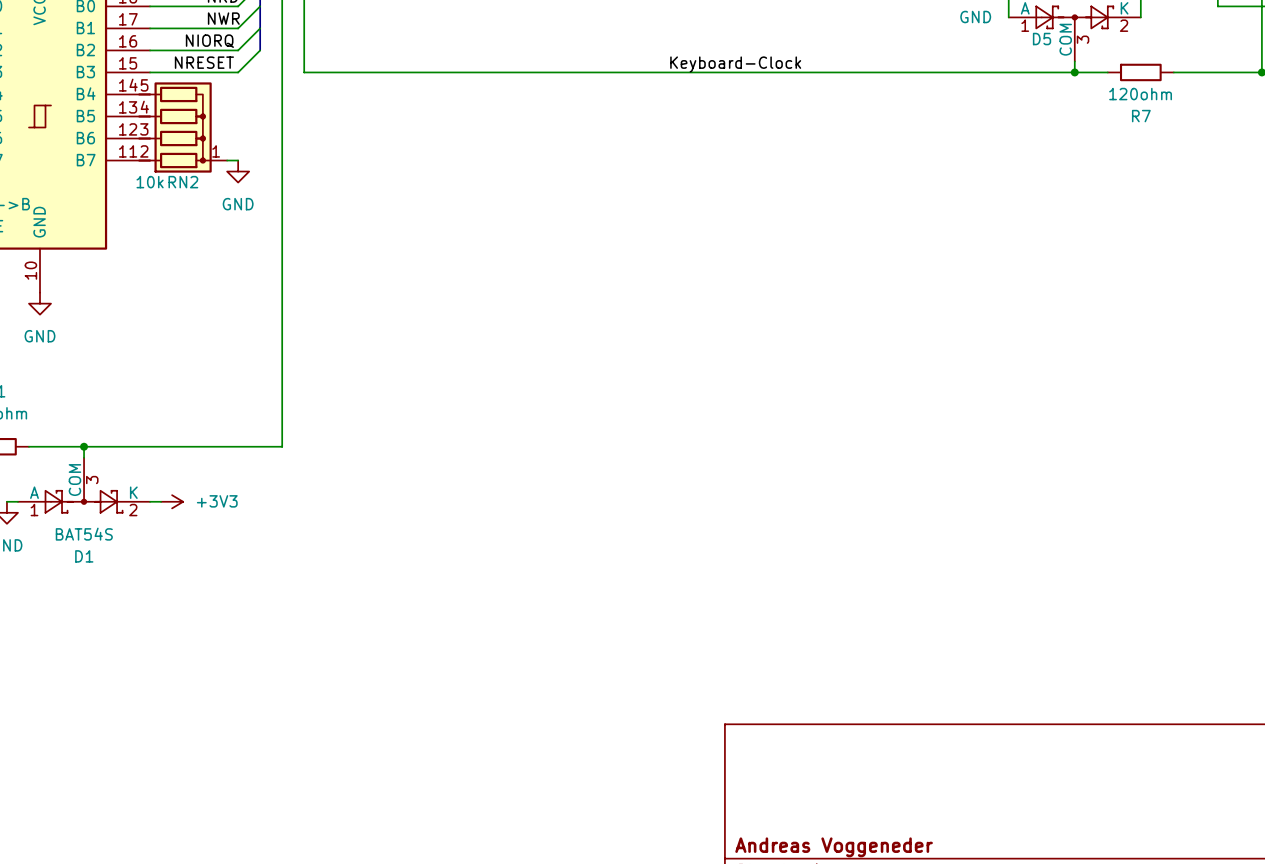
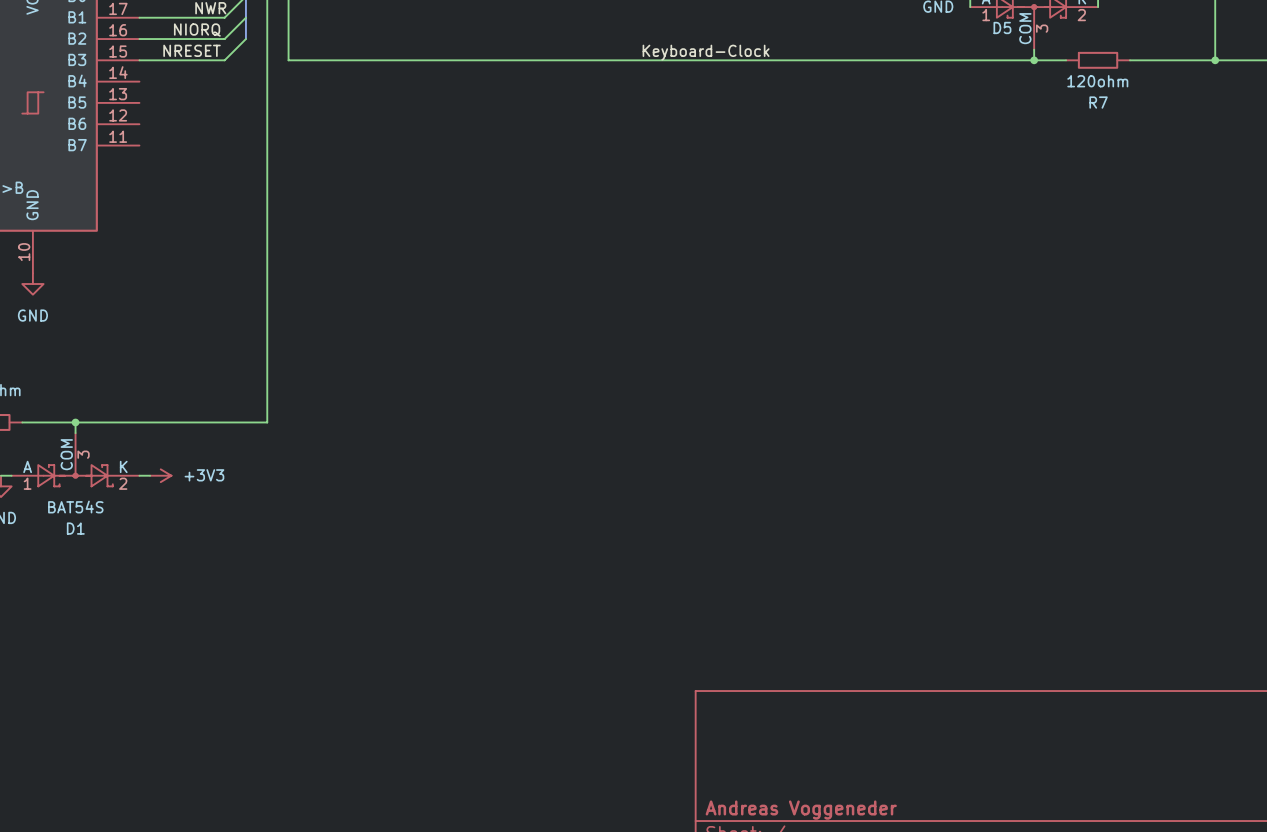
RN2: 10k (183, 127) -> none
wire: (227, 160) (238, 160) -> none
power symbol: GND (238, 171) -> none

